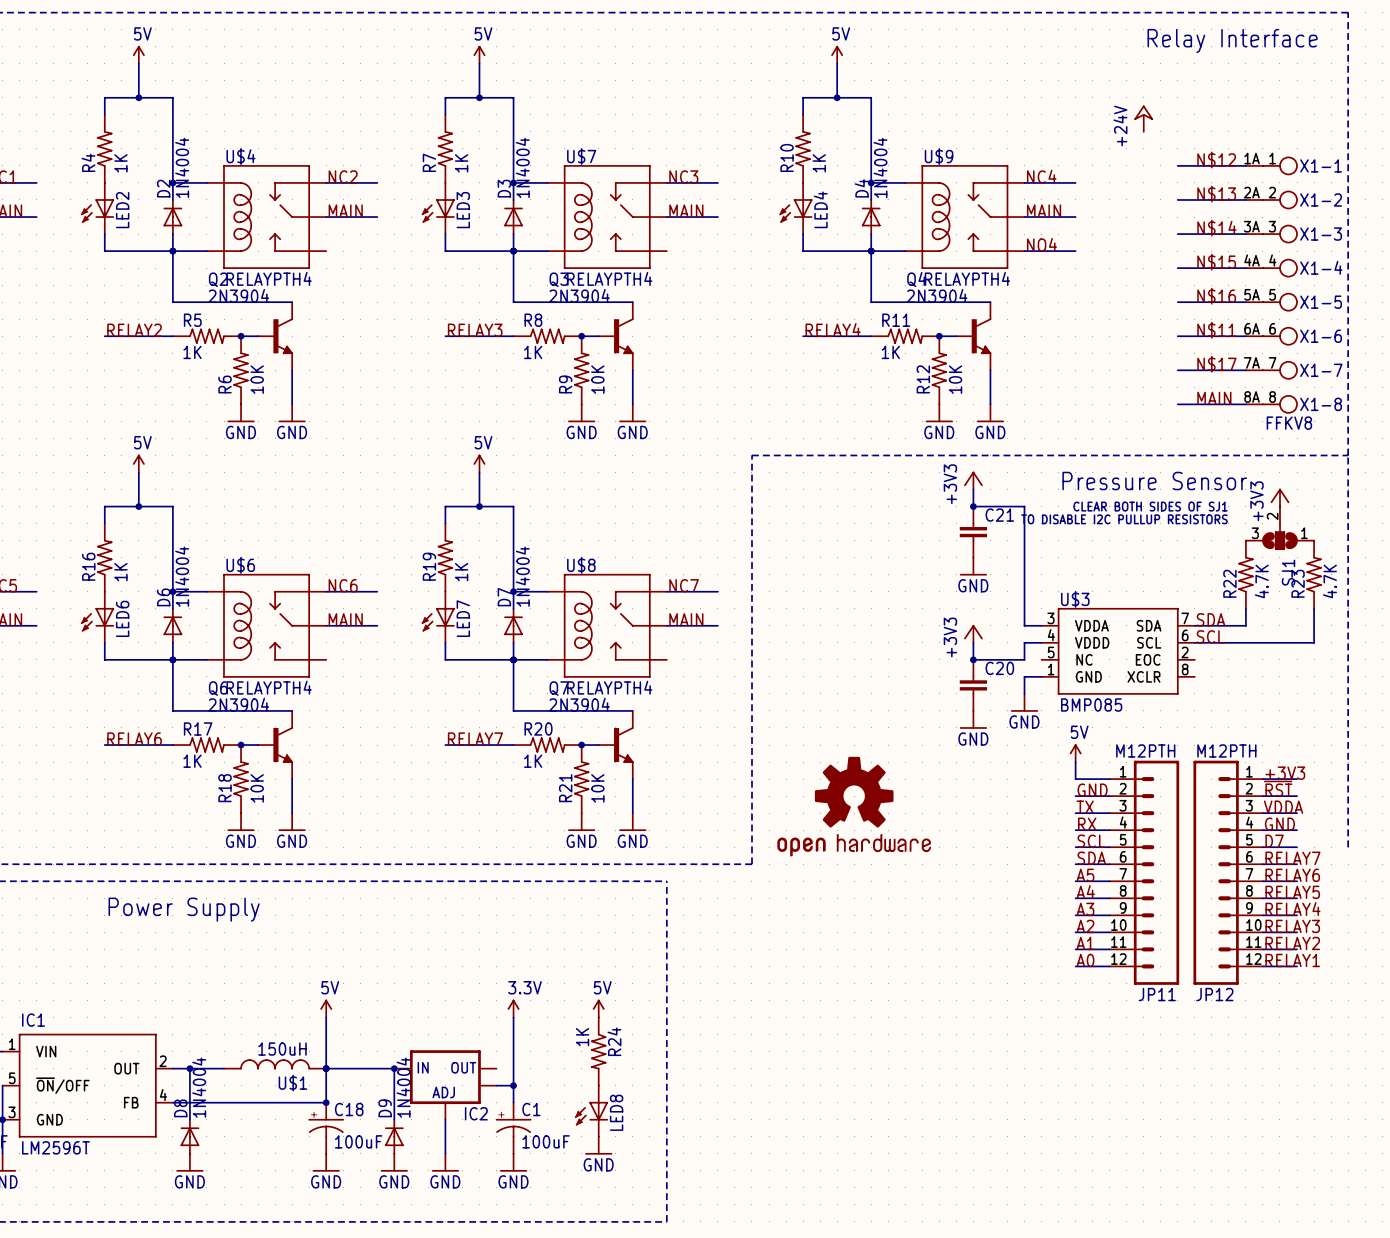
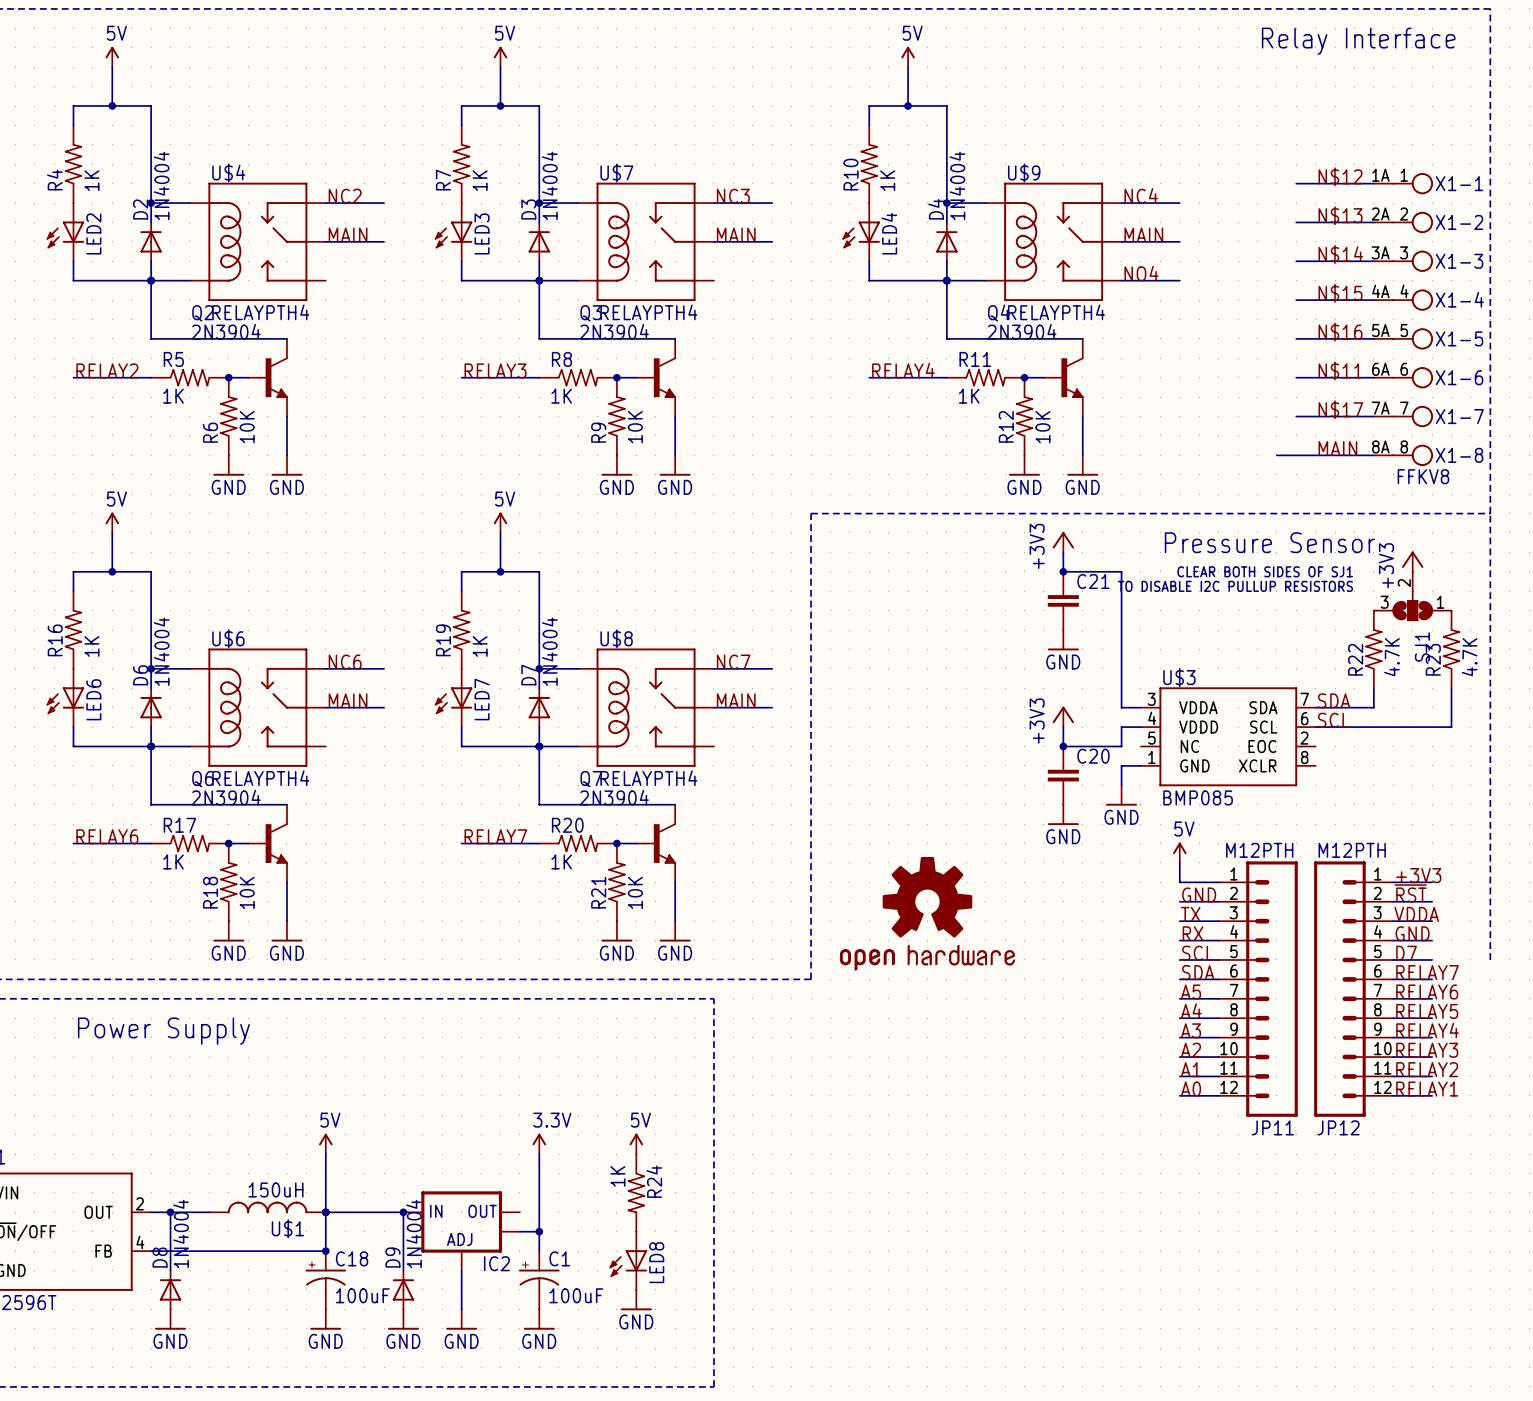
power symbol: +24V (1143, 118) -> none
wire: none -> (1276, 455) (1296, 455)

